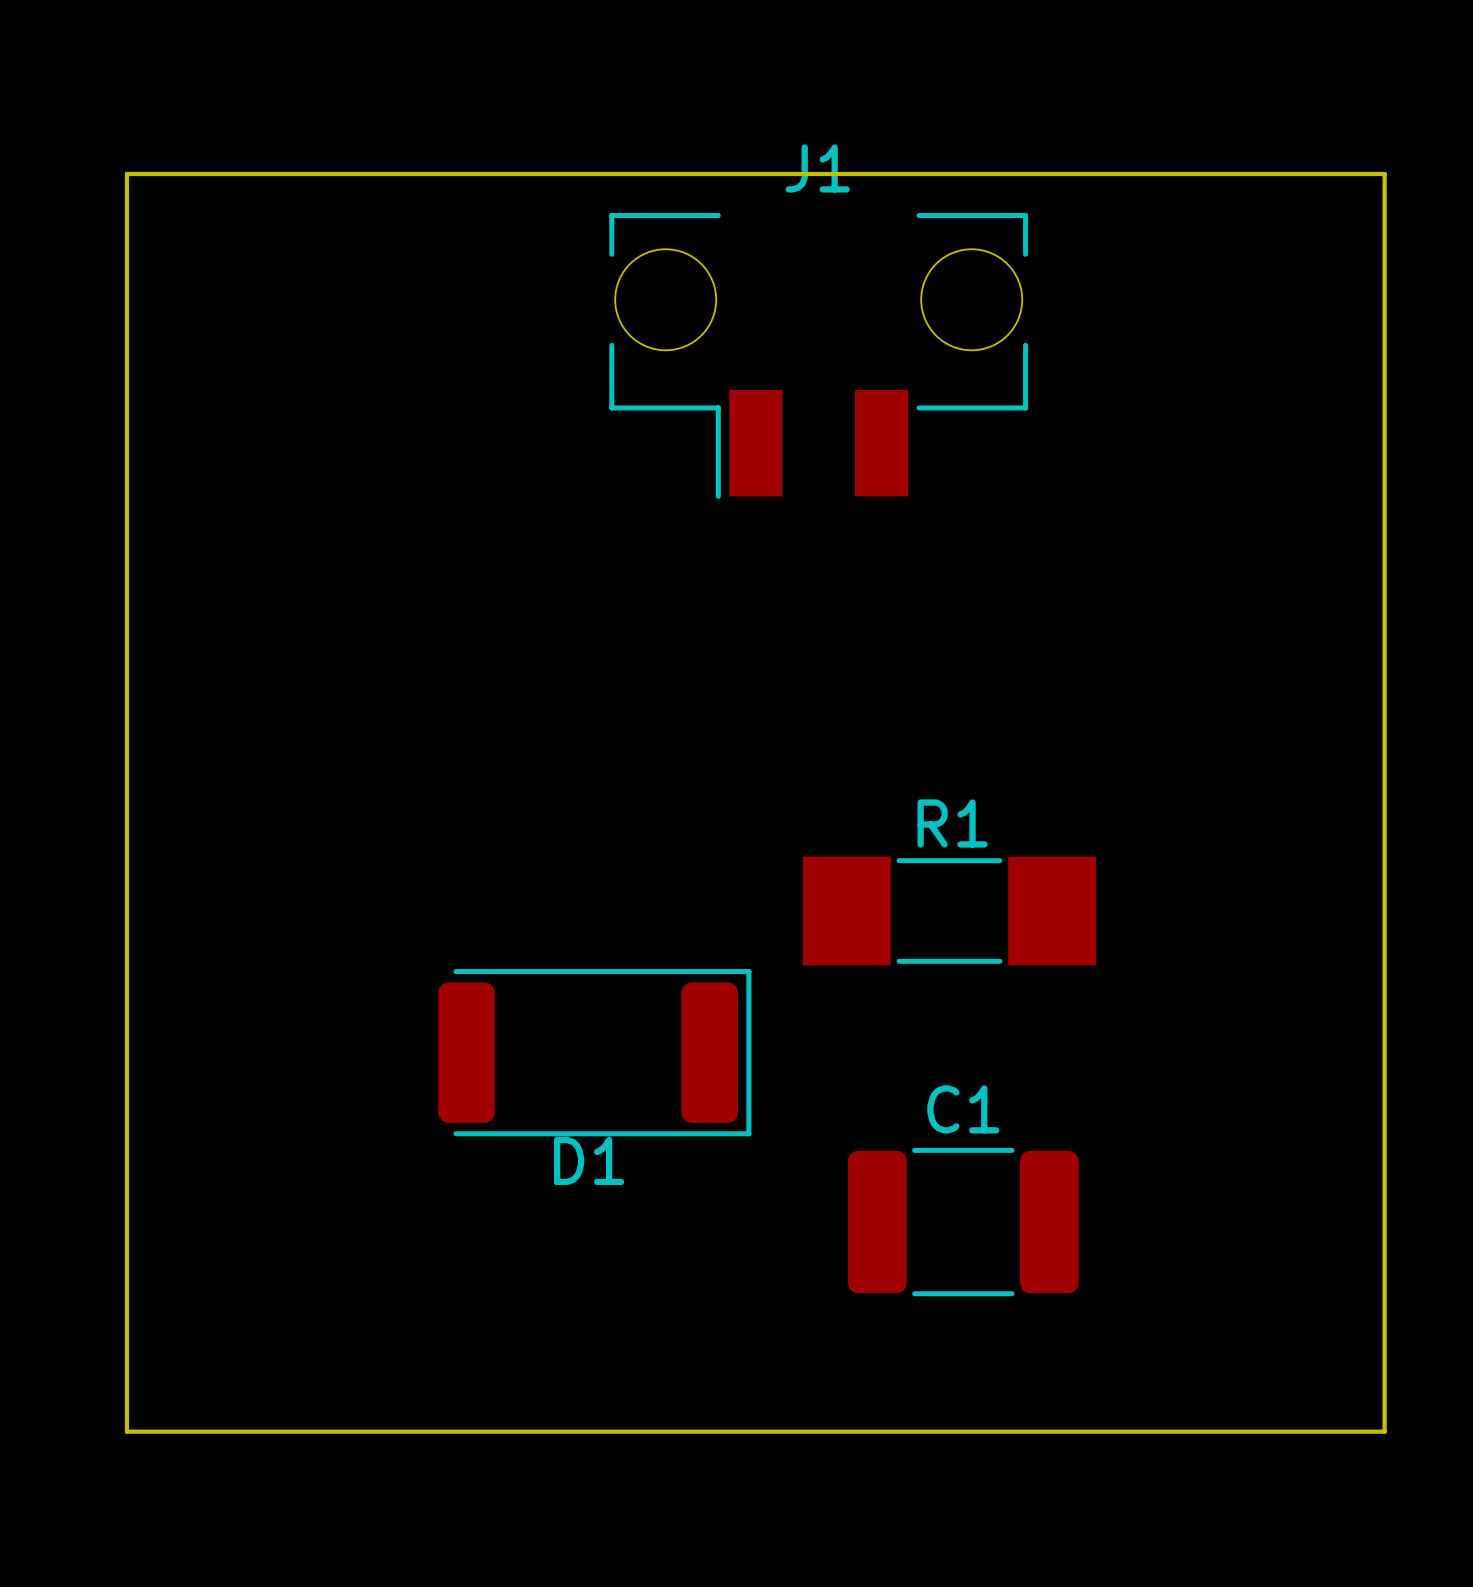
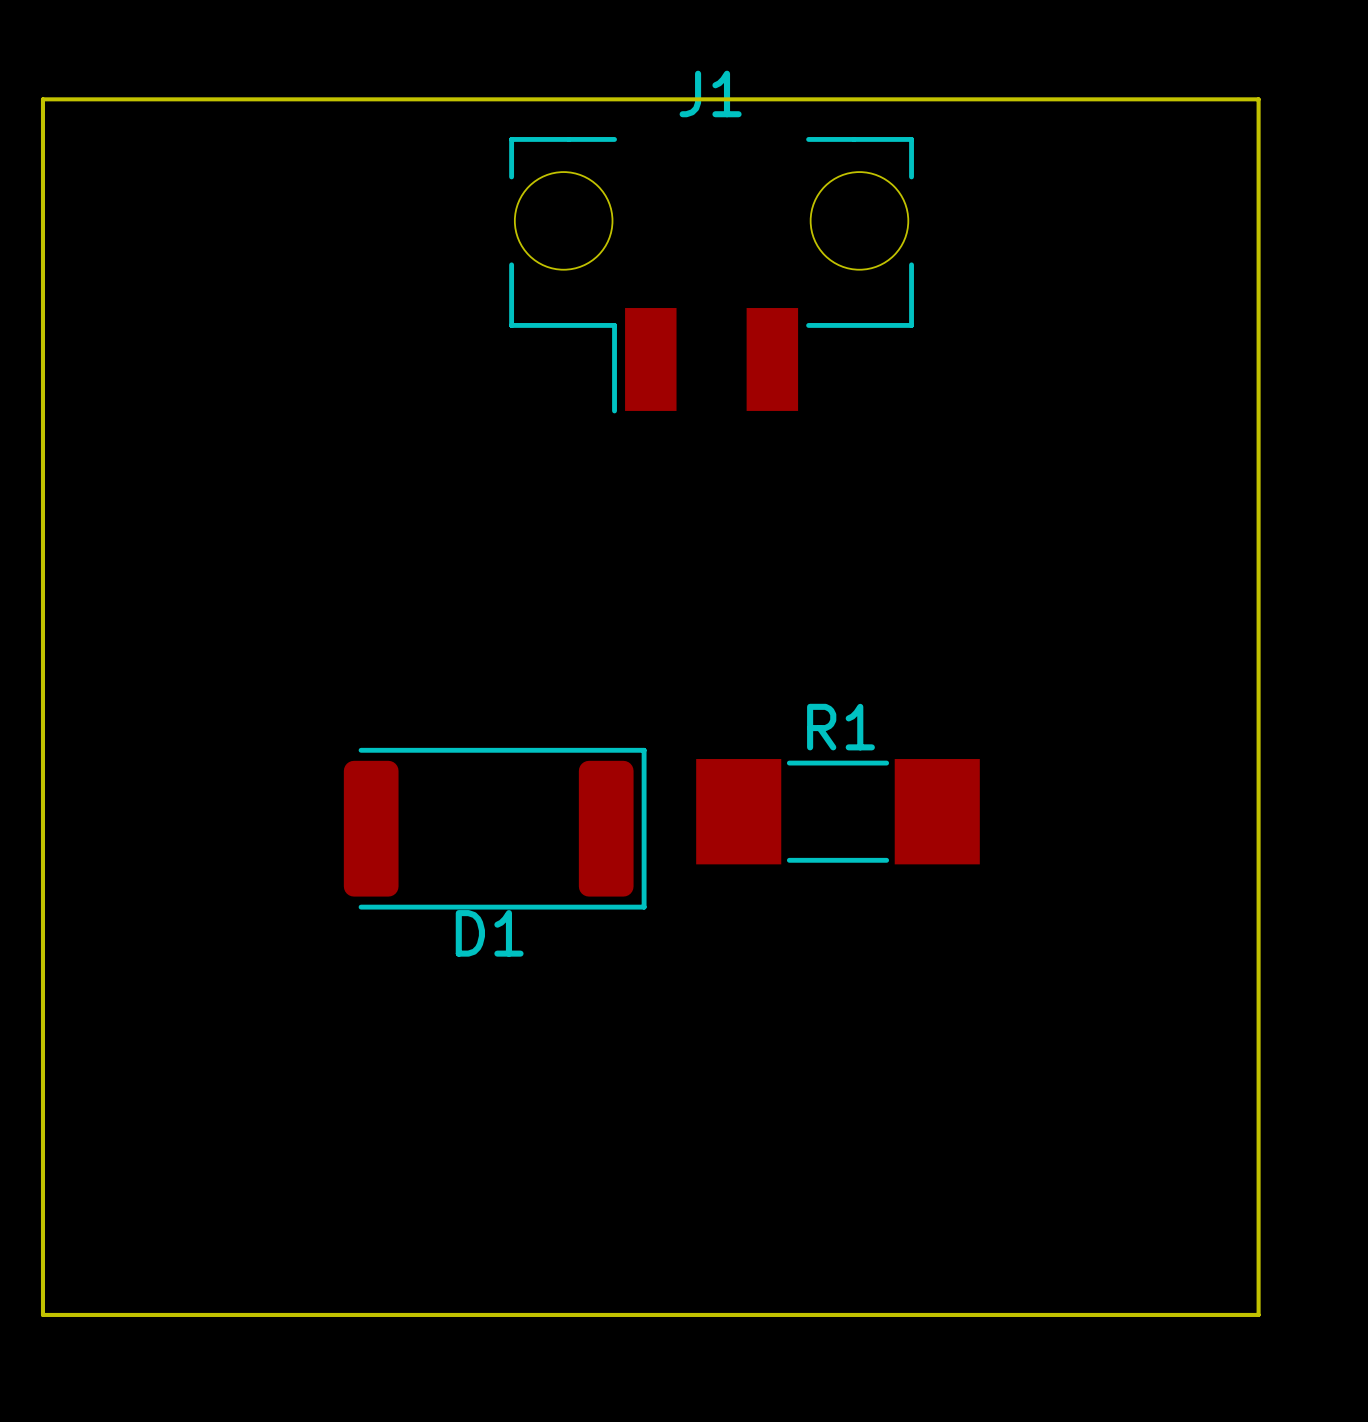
D1 position: (594, 1052) -> (495, 828)
C1: (963, 1222) -> none

